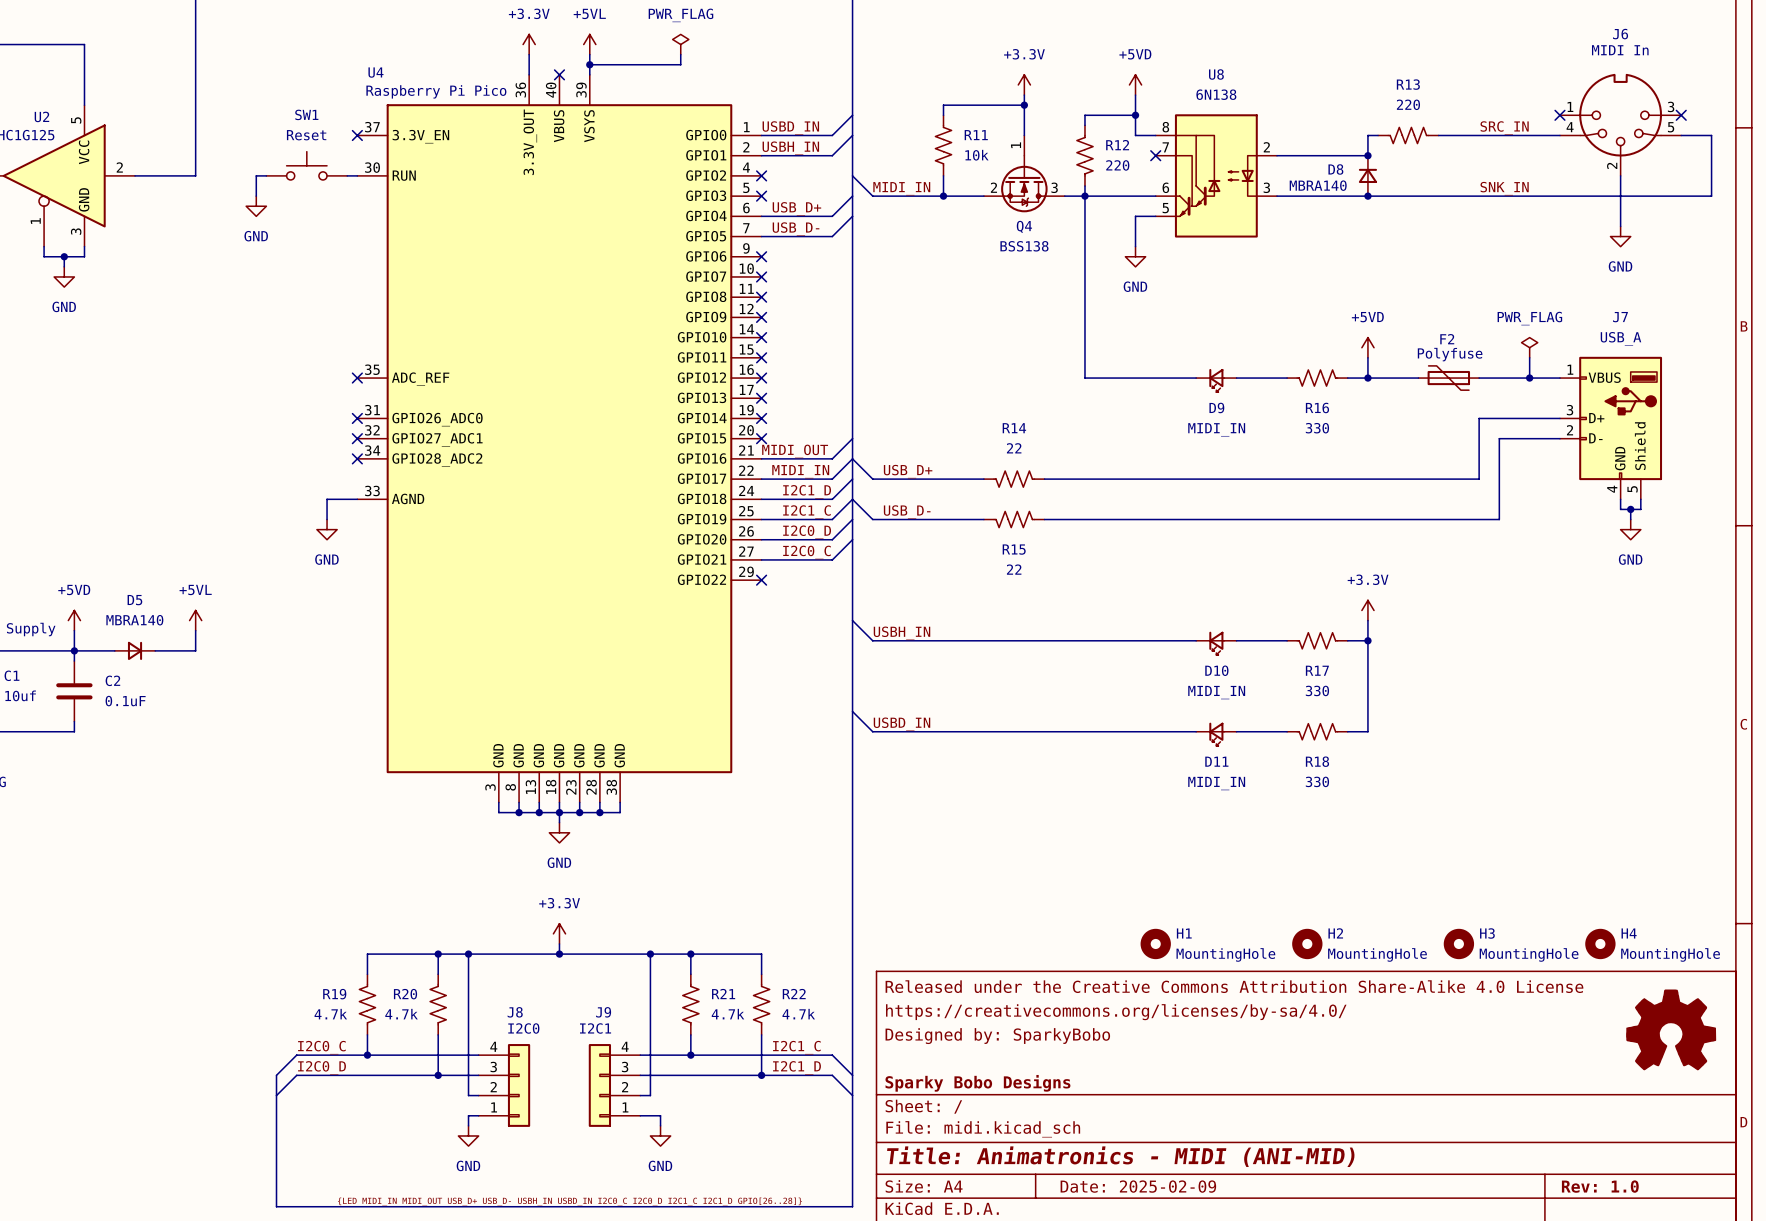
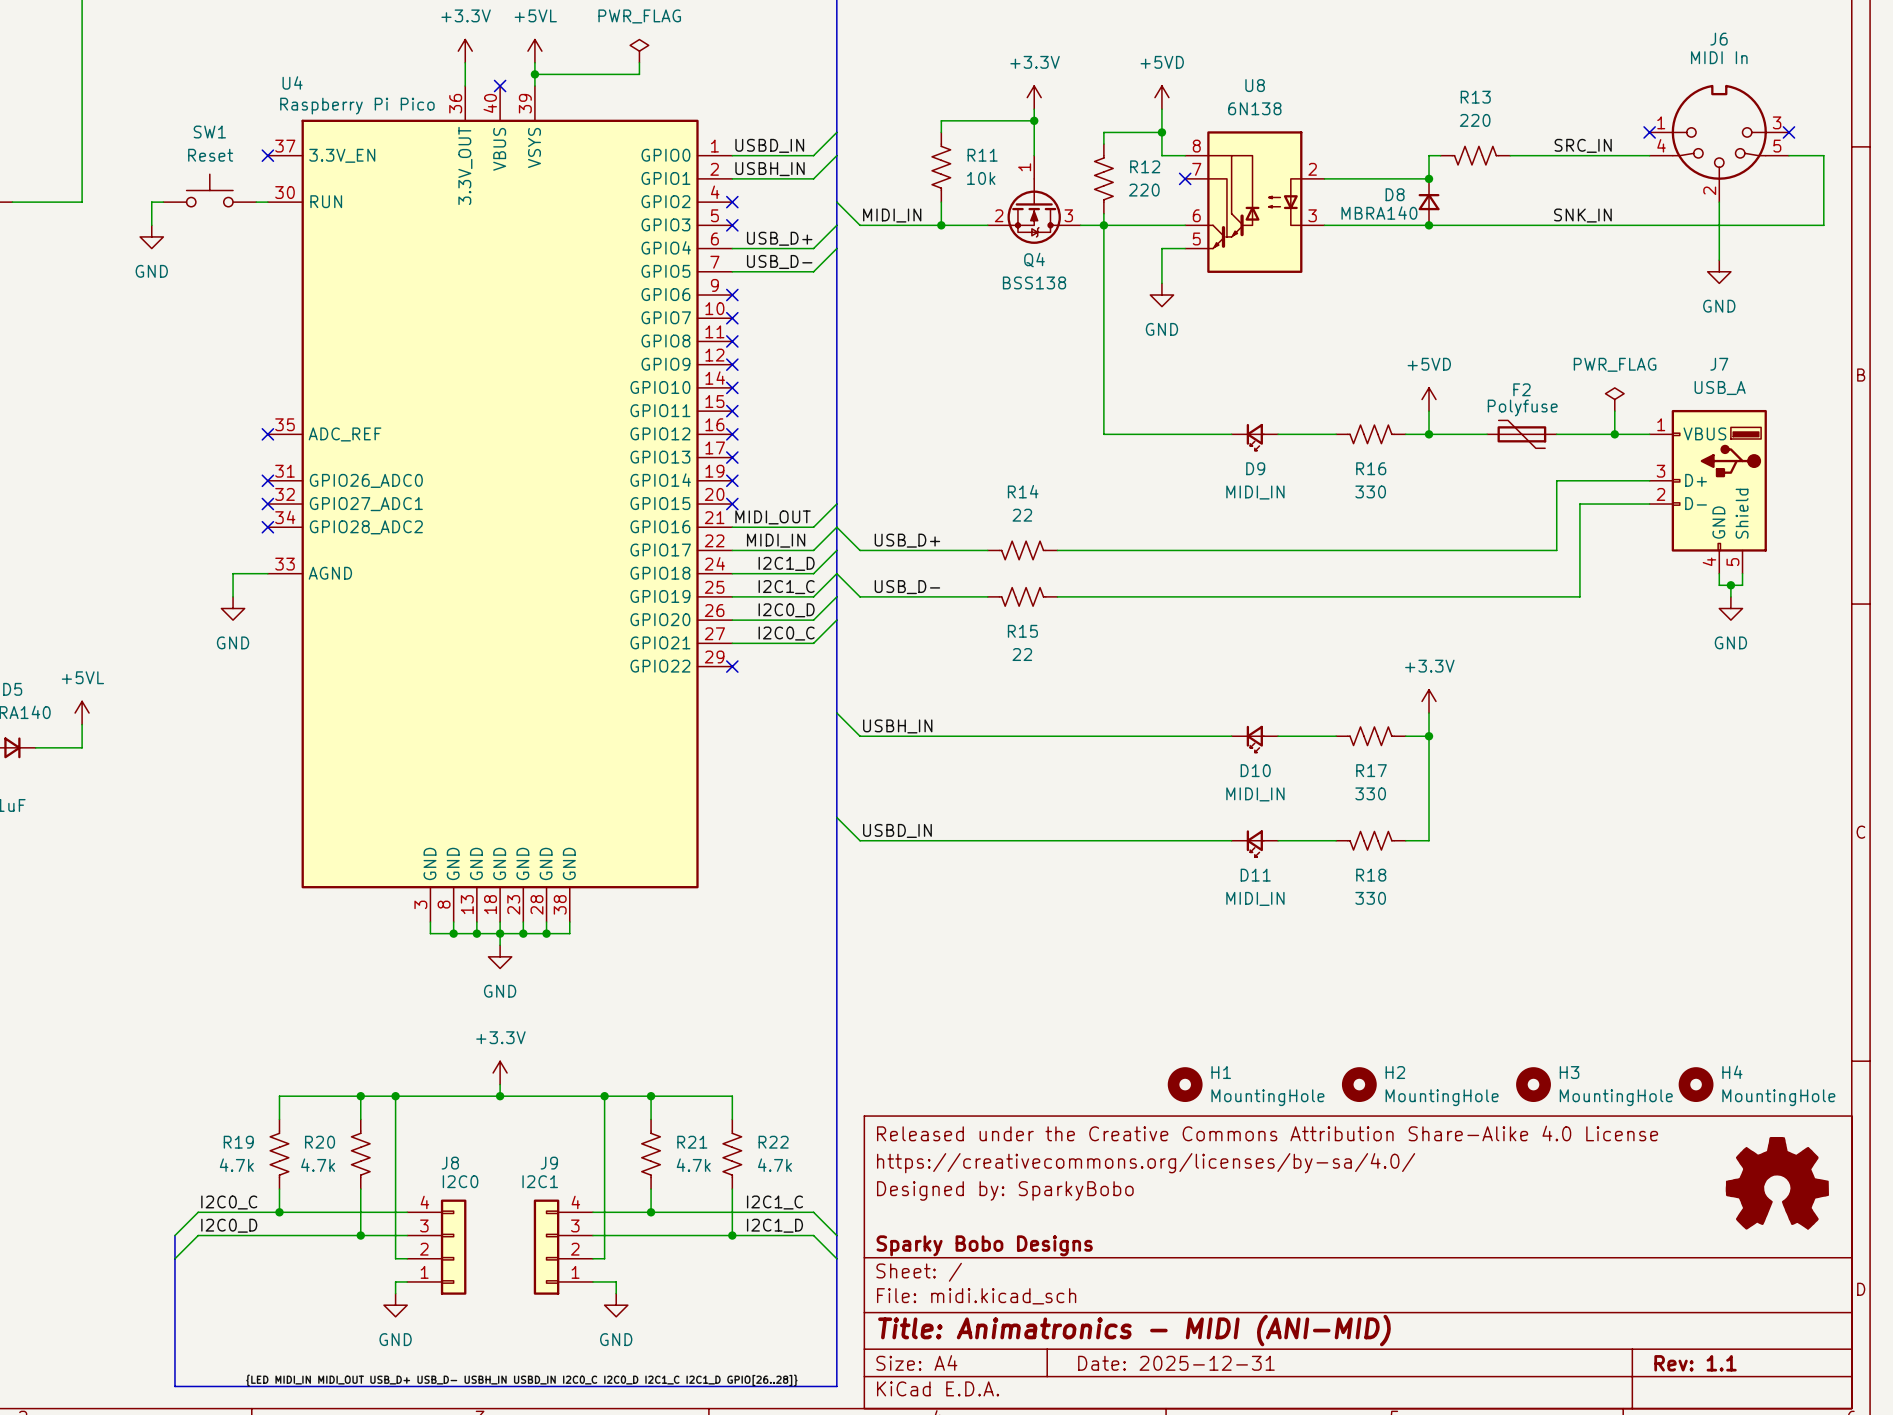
title block: Date: 2025-02-09 (1138, 1186) -> Date: 2025-12-31 (1176, 1363)
title block: Rev: 1.0 (1600, 1186) -> Rev: 1.1 (1695, 1363)

